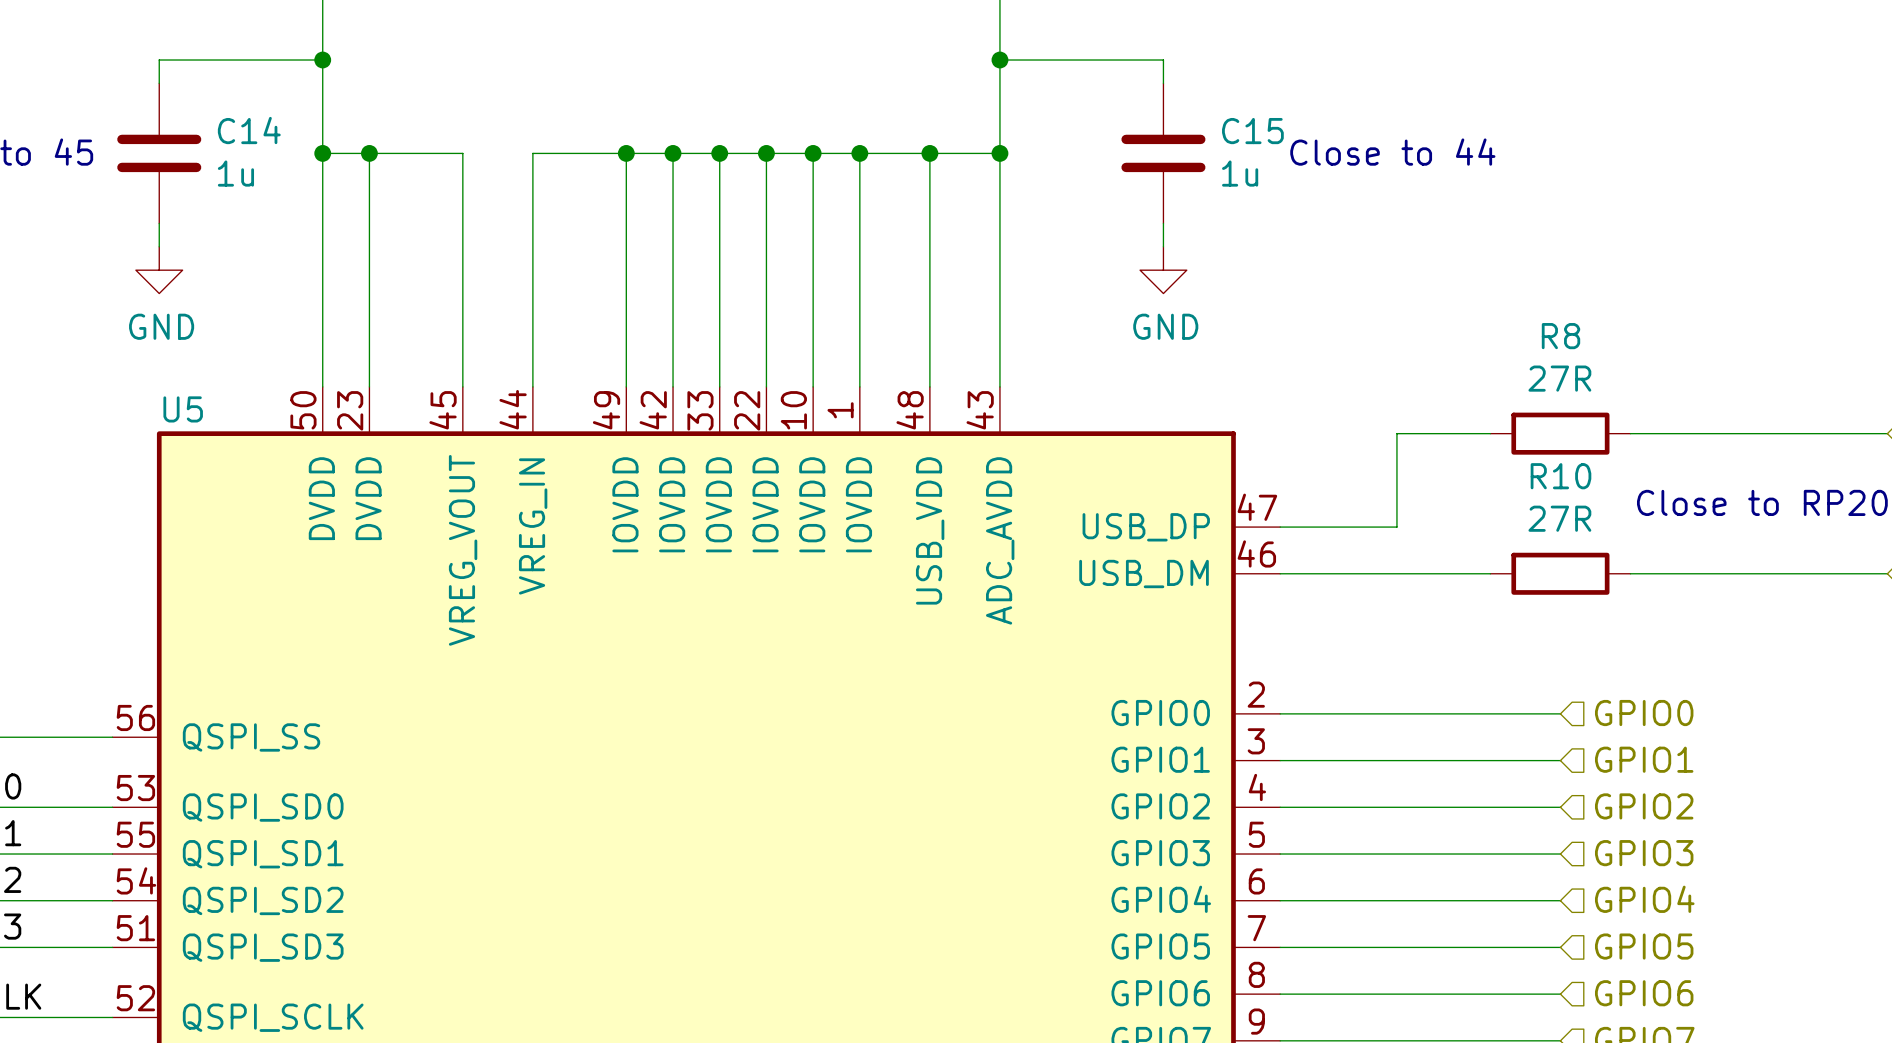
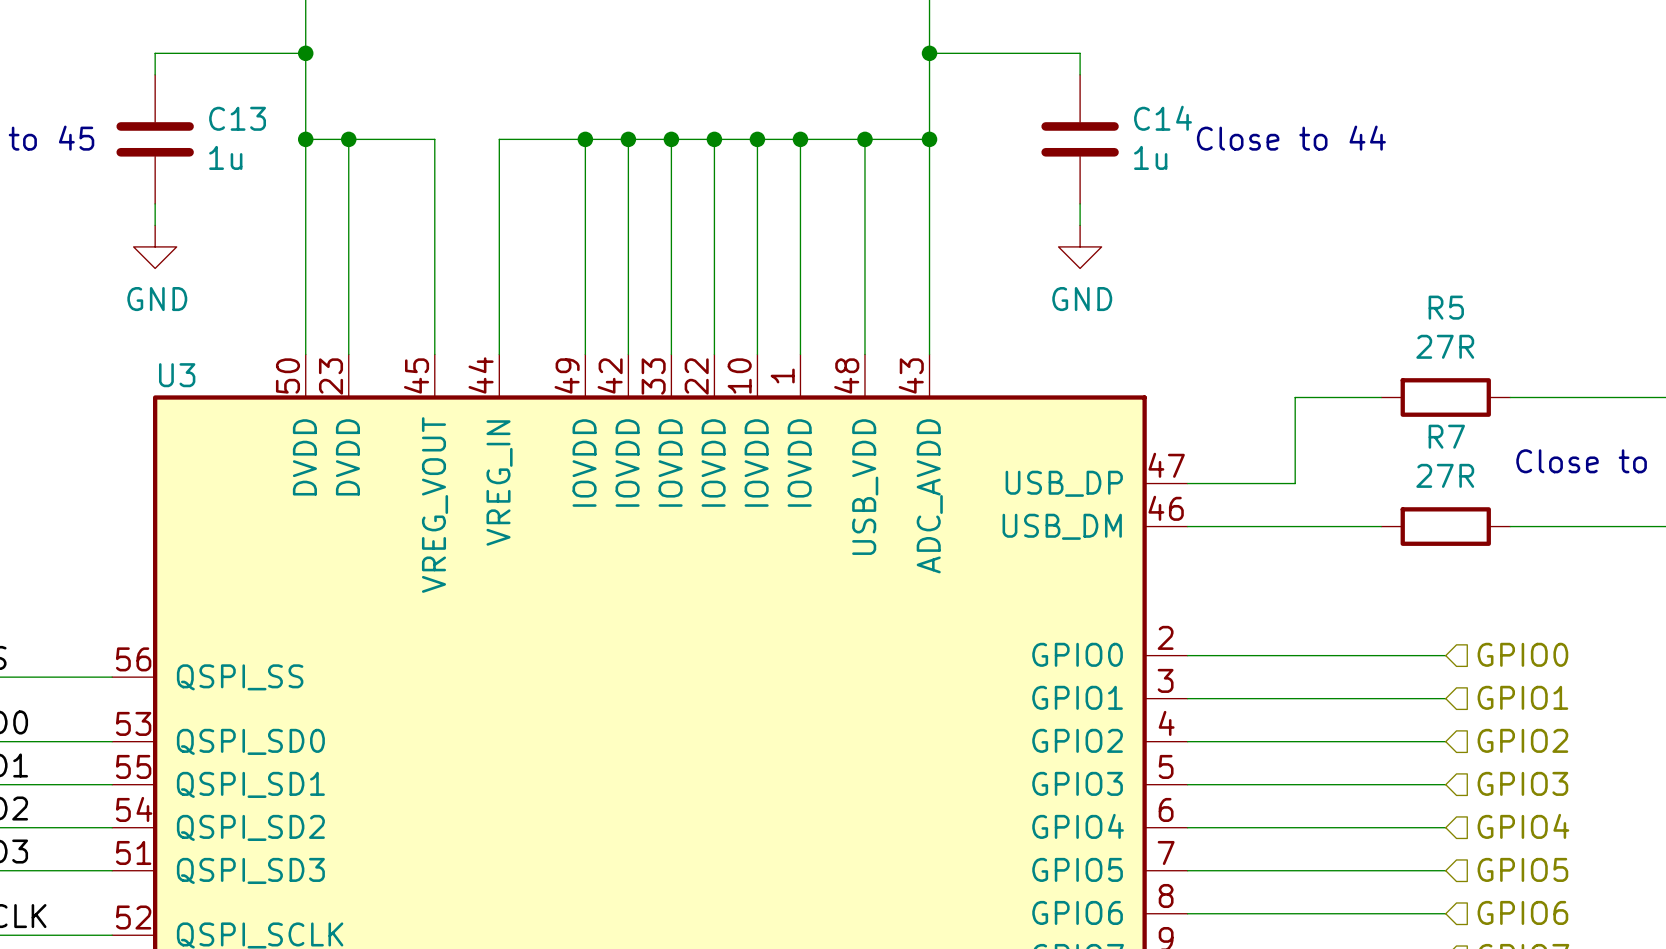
C14 name: C14 (249, 130) -> C13 (237, 118)
C15 name: C15 (1252, 131) -> C14 (1163, 118)
R8 name: R8 (1560, 336) -> R5 (1446, 307)
U5 name: U5 (183, 409) -> U3 (177, 375)
R10 name: R10 (1560, 476) -> R7 (1446, 436)

